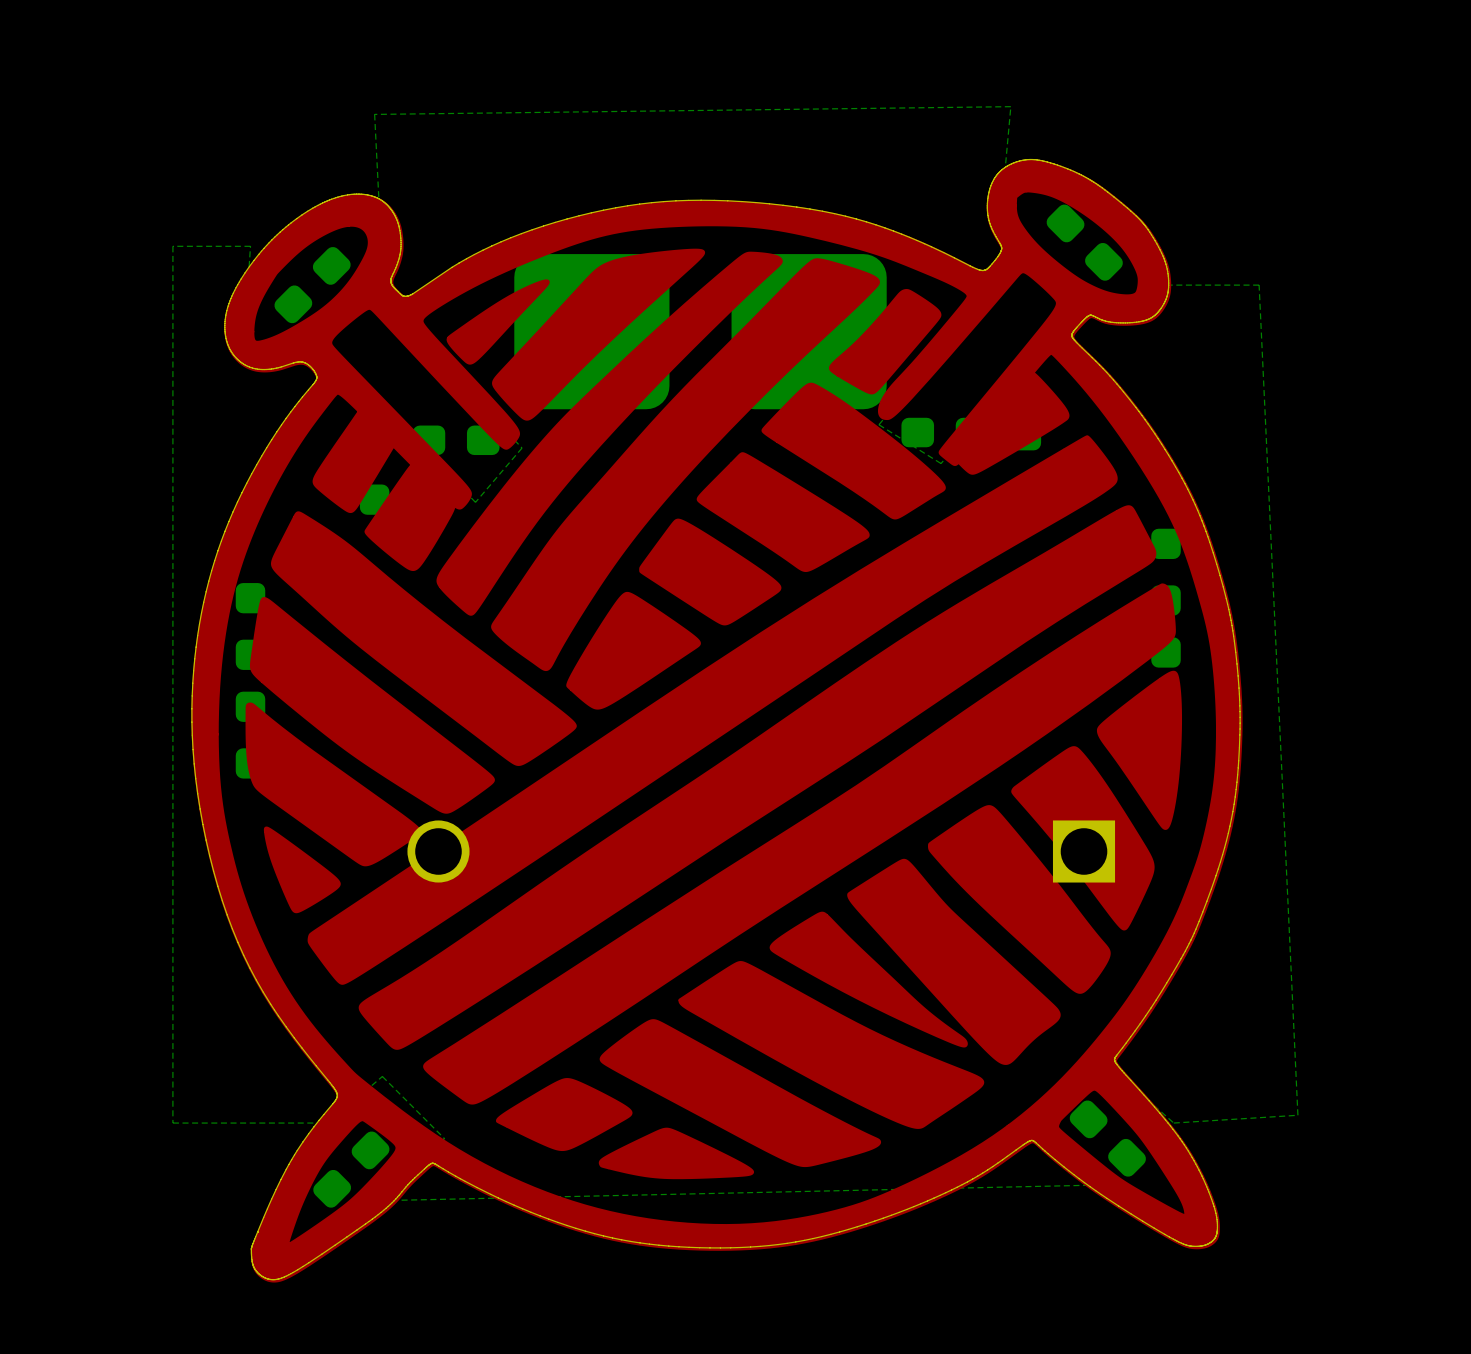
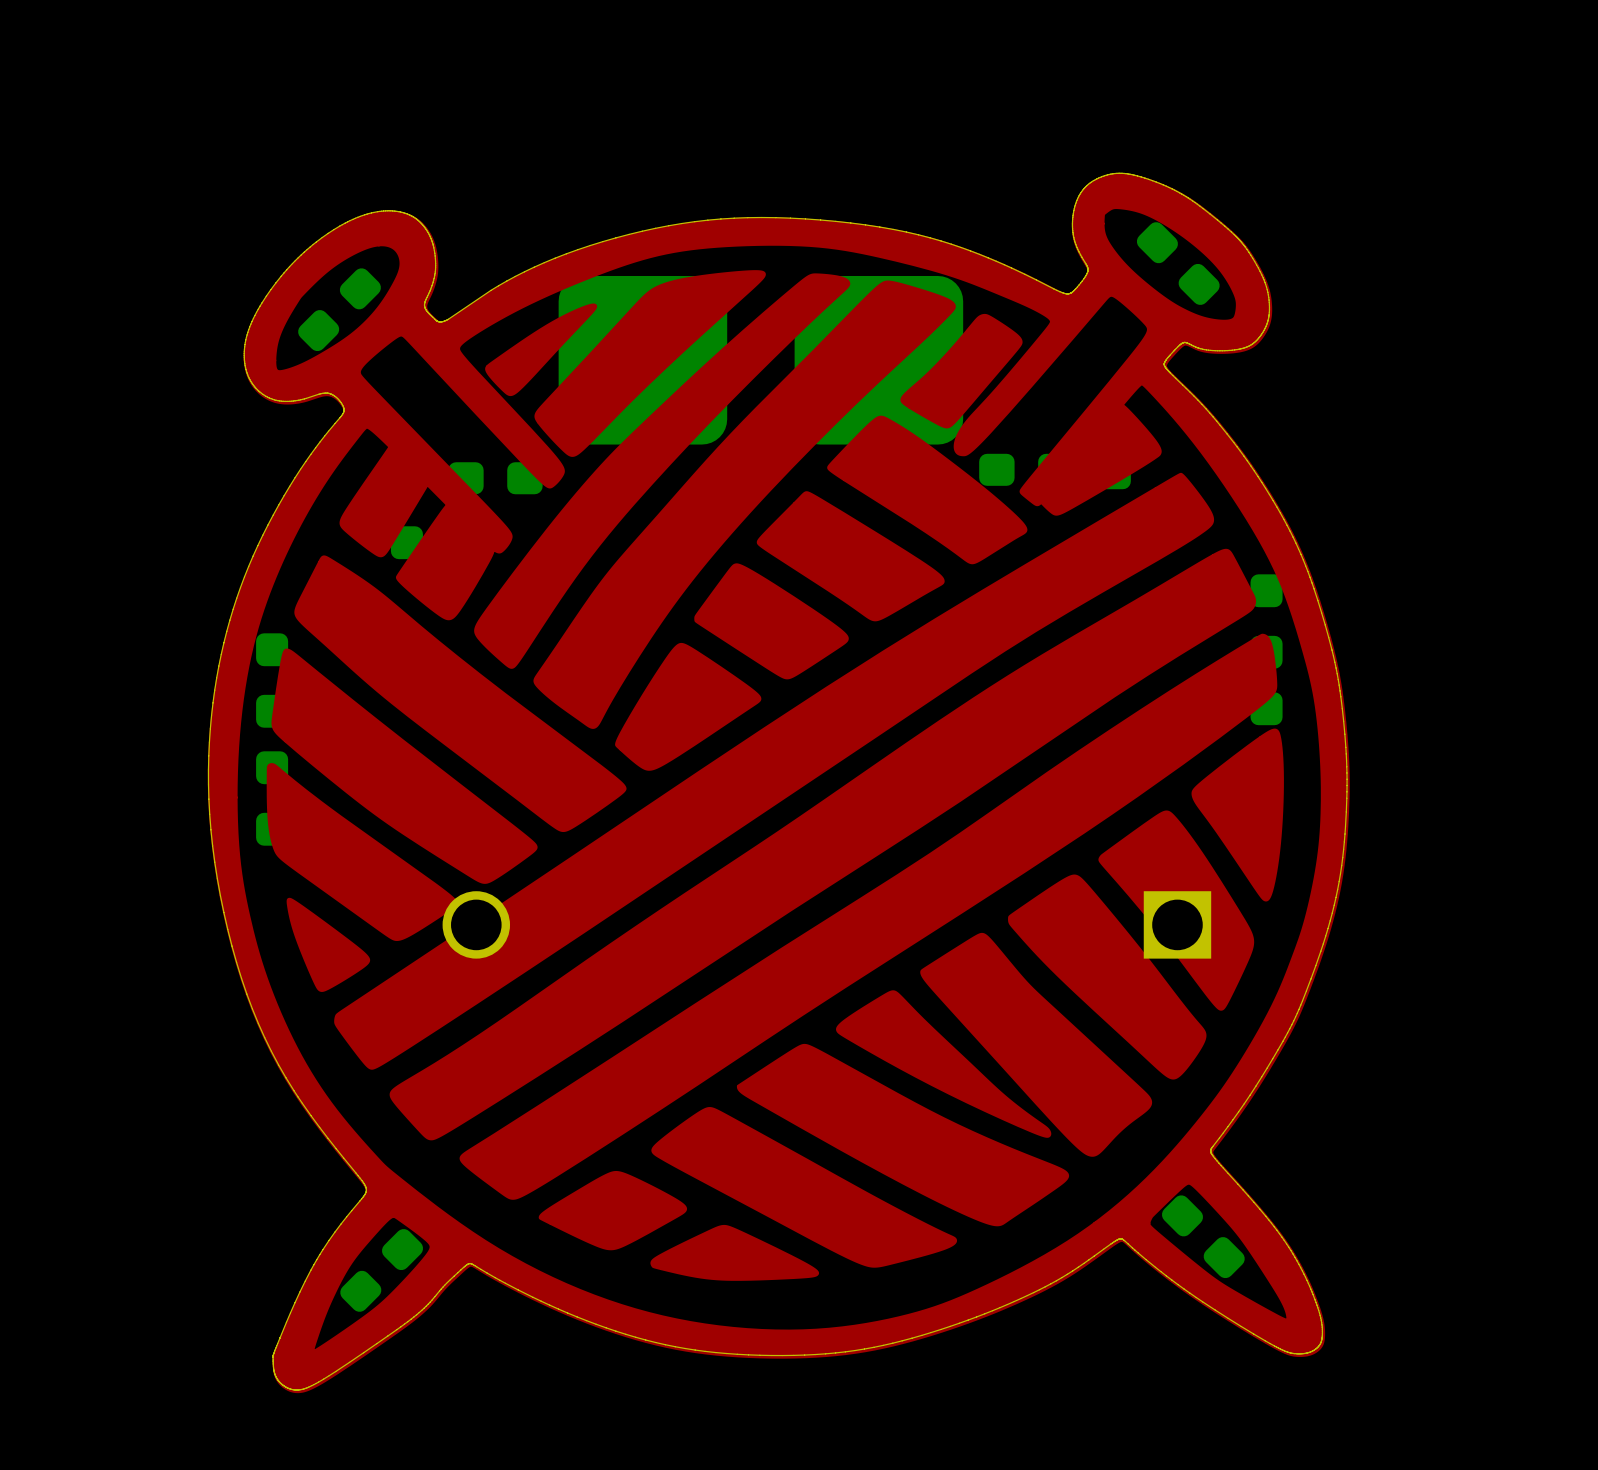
bottom zone outline: (1010, 106) (1003, 192) (1018, 246) (995, 285) (878, 424) (941, 463) (1080, 300) (1127, 316) (1166, 285) (1259, 285) (1297, 1115) (1173, 1123) (1103, 1060) (1034, 1123) (1096, 1185) (382, 1200) (444, 1138) (382, 1076) (328, 1123) (172, 1123) (172, 246) (250, 246) (242, 362) (258, 362) (320, 339) (475, 502) (522, 448) (382, 300) (374, 114) (1010, 106) -> none

